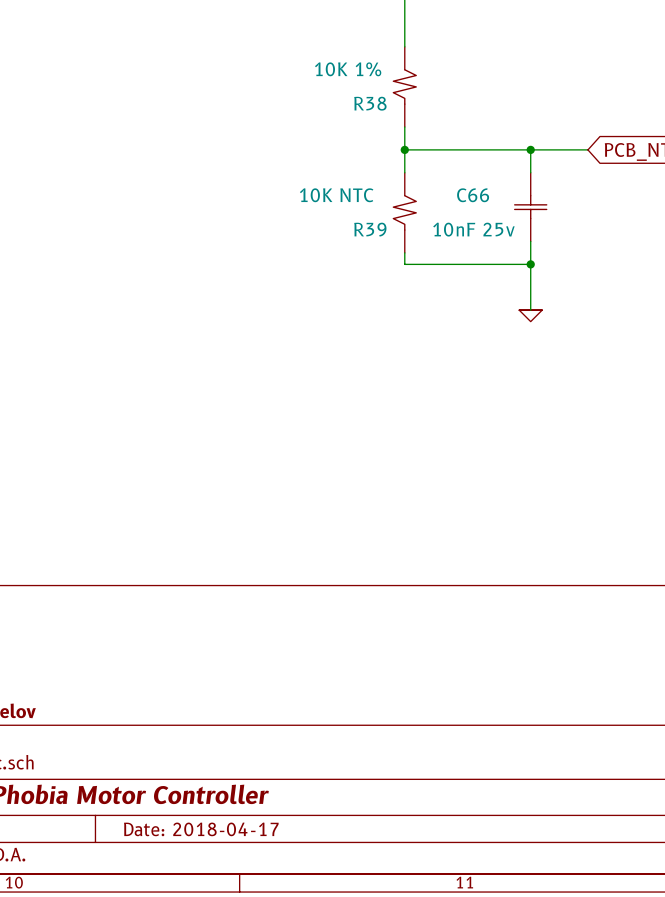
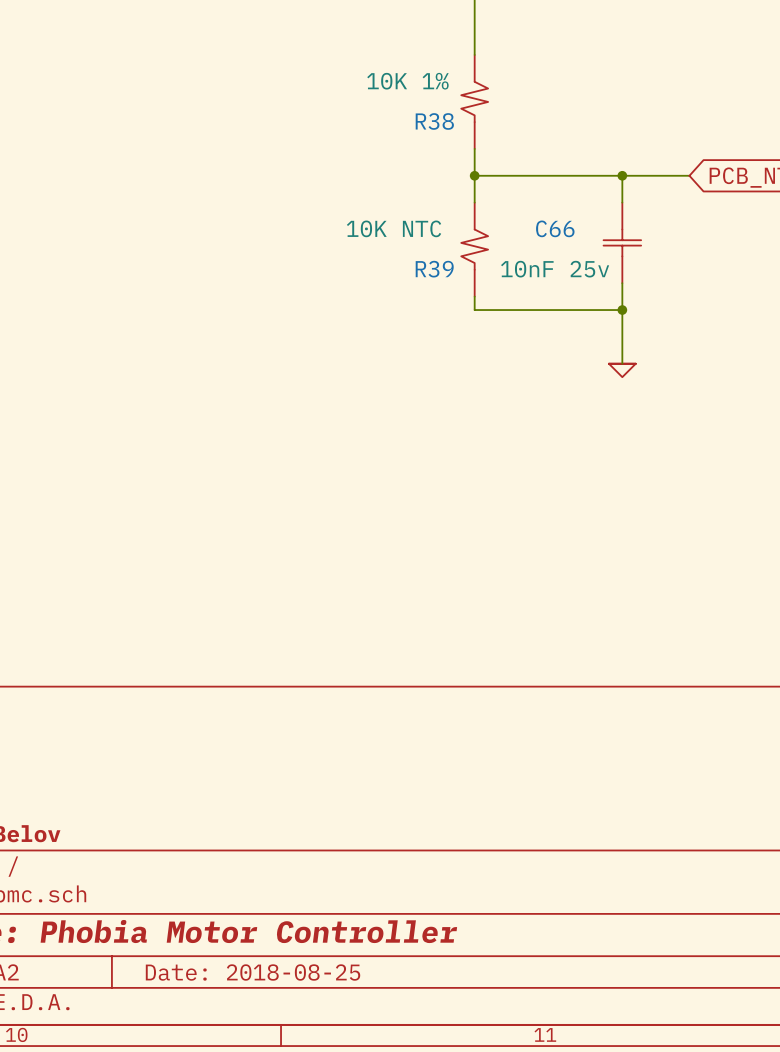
title block: Date: 2018-04-17 (201, 829) -> Date: 2018-08-25 (253, 972)

